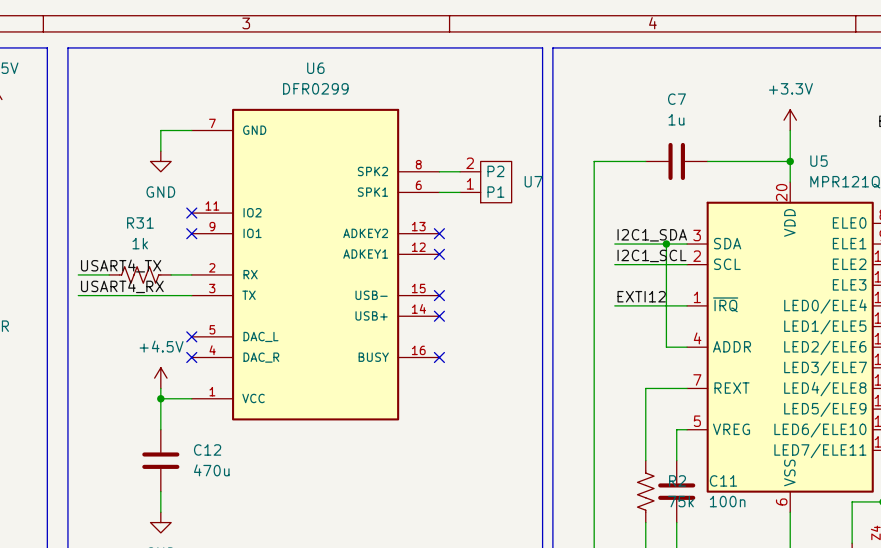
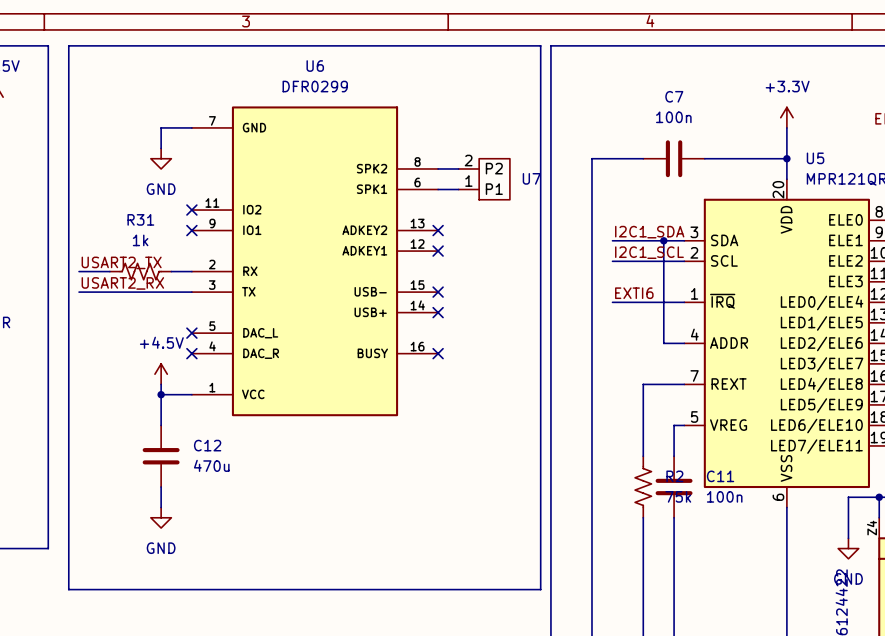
C7 value: 1u (676, 119) -> 100n (673, 117)
label: USART4_TX (121, 266) -> USART2_TX (121, 262)
label: USART4_RX (122, 286) -> USART2_RX (122, 283)
label: EXTI12 (641, 296) -> EXTI6 (634, 293)

